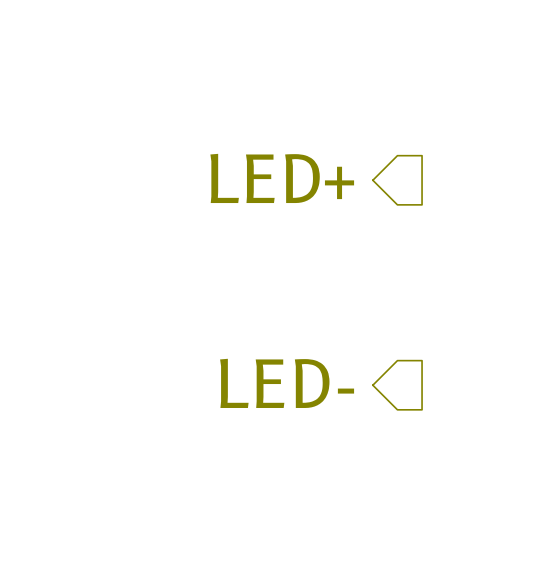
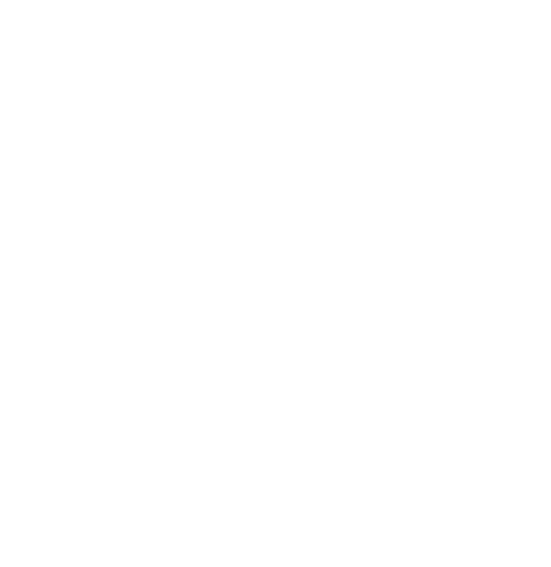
hierarchical label: LED+ (282, 178) -> none
hierarchical label: LED- (287, 383) -> none

